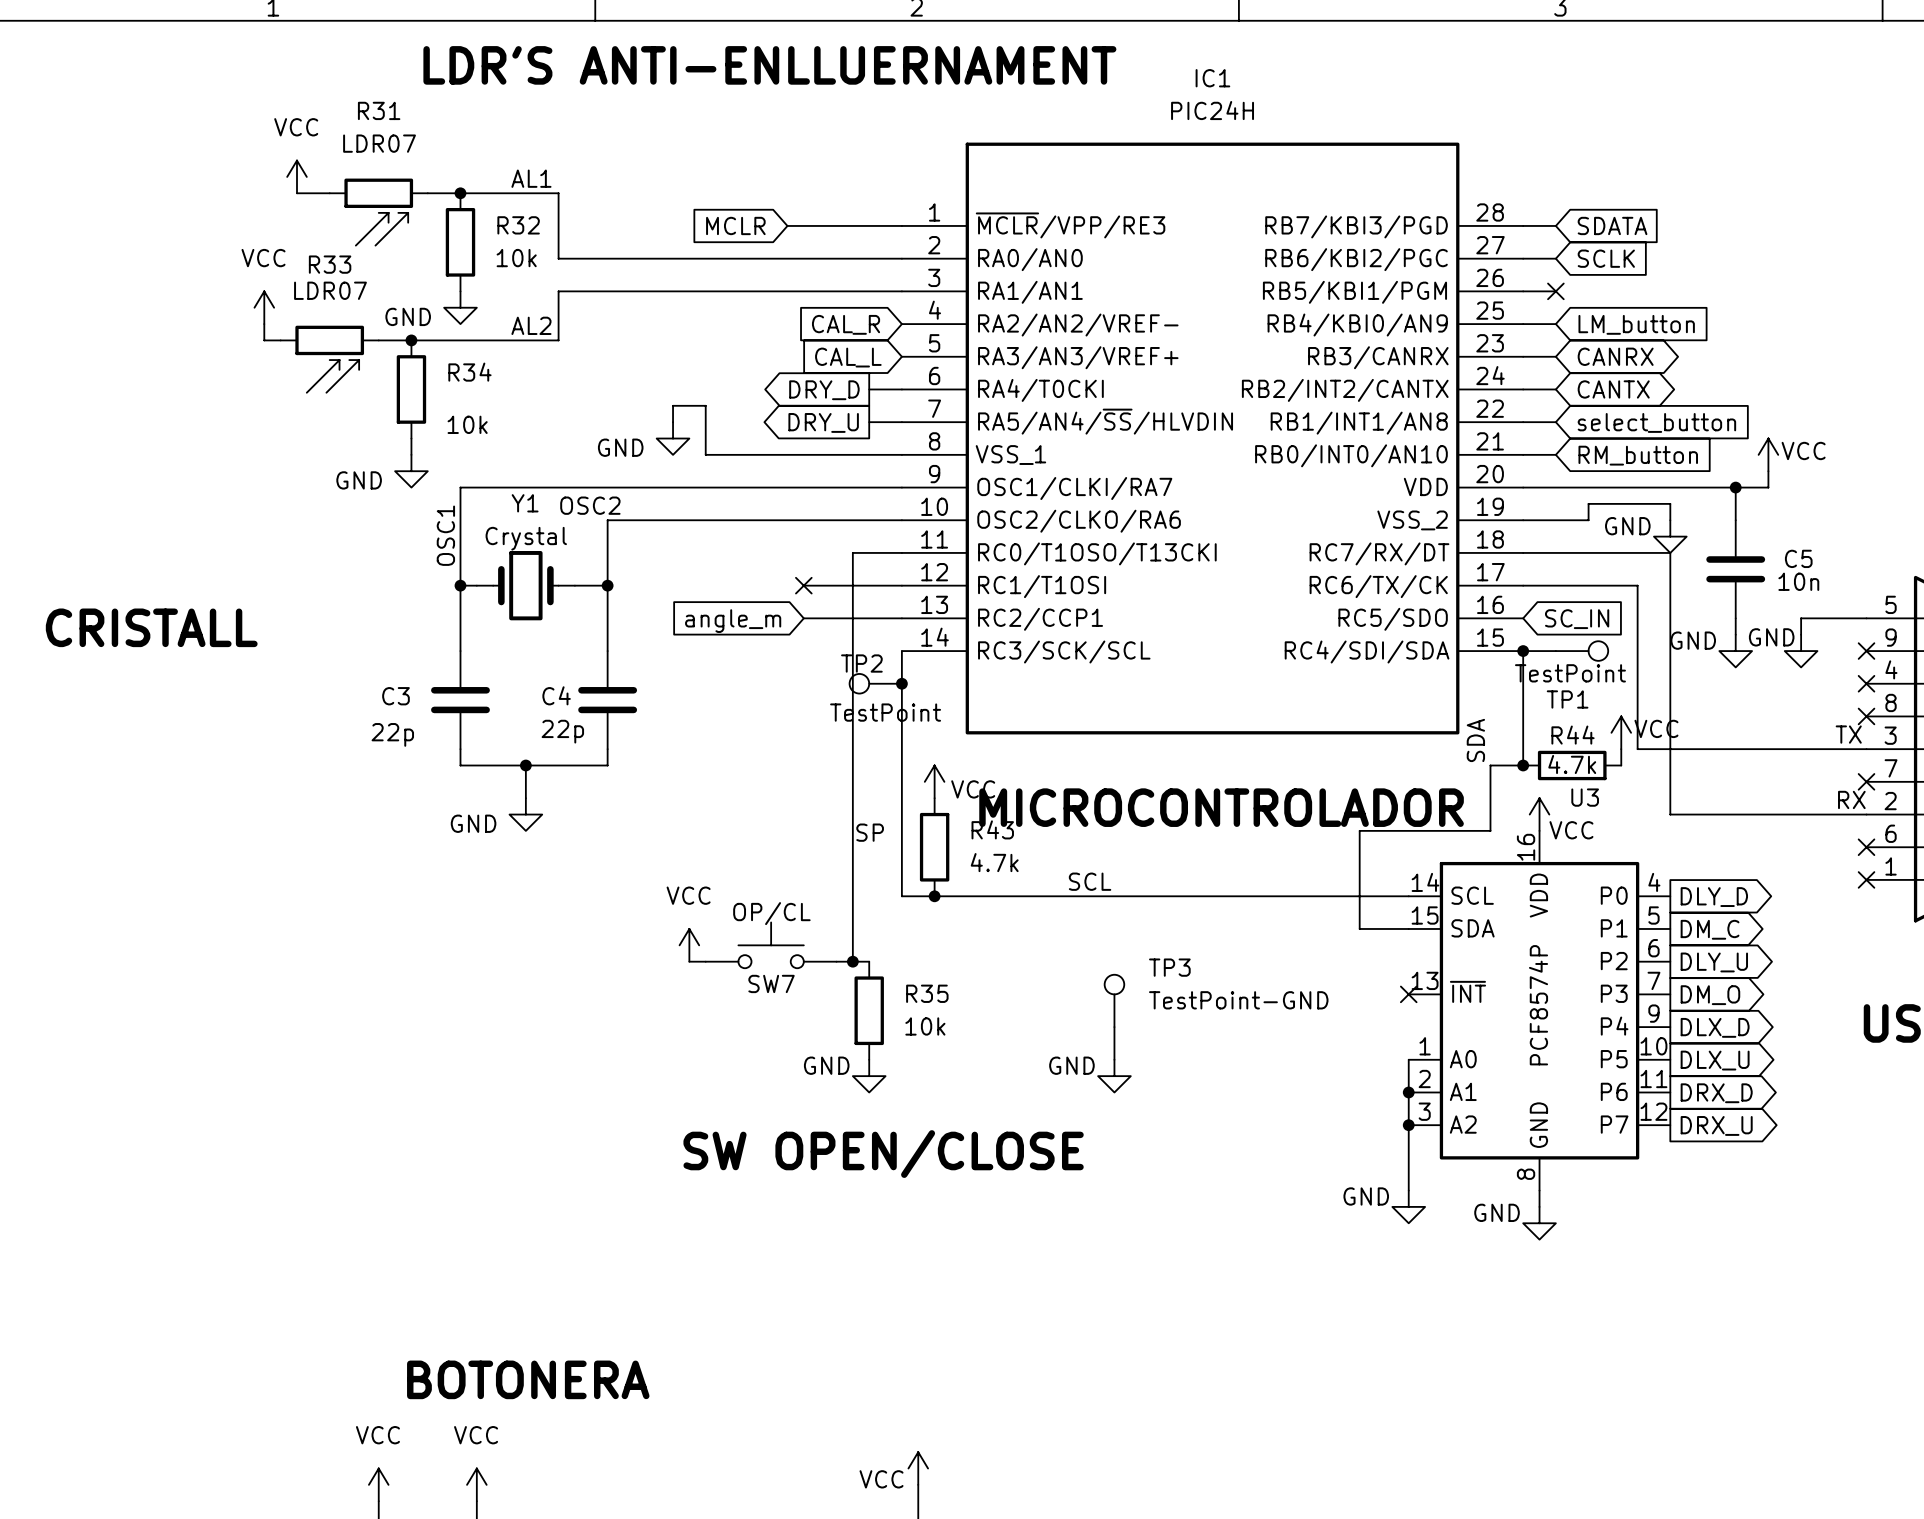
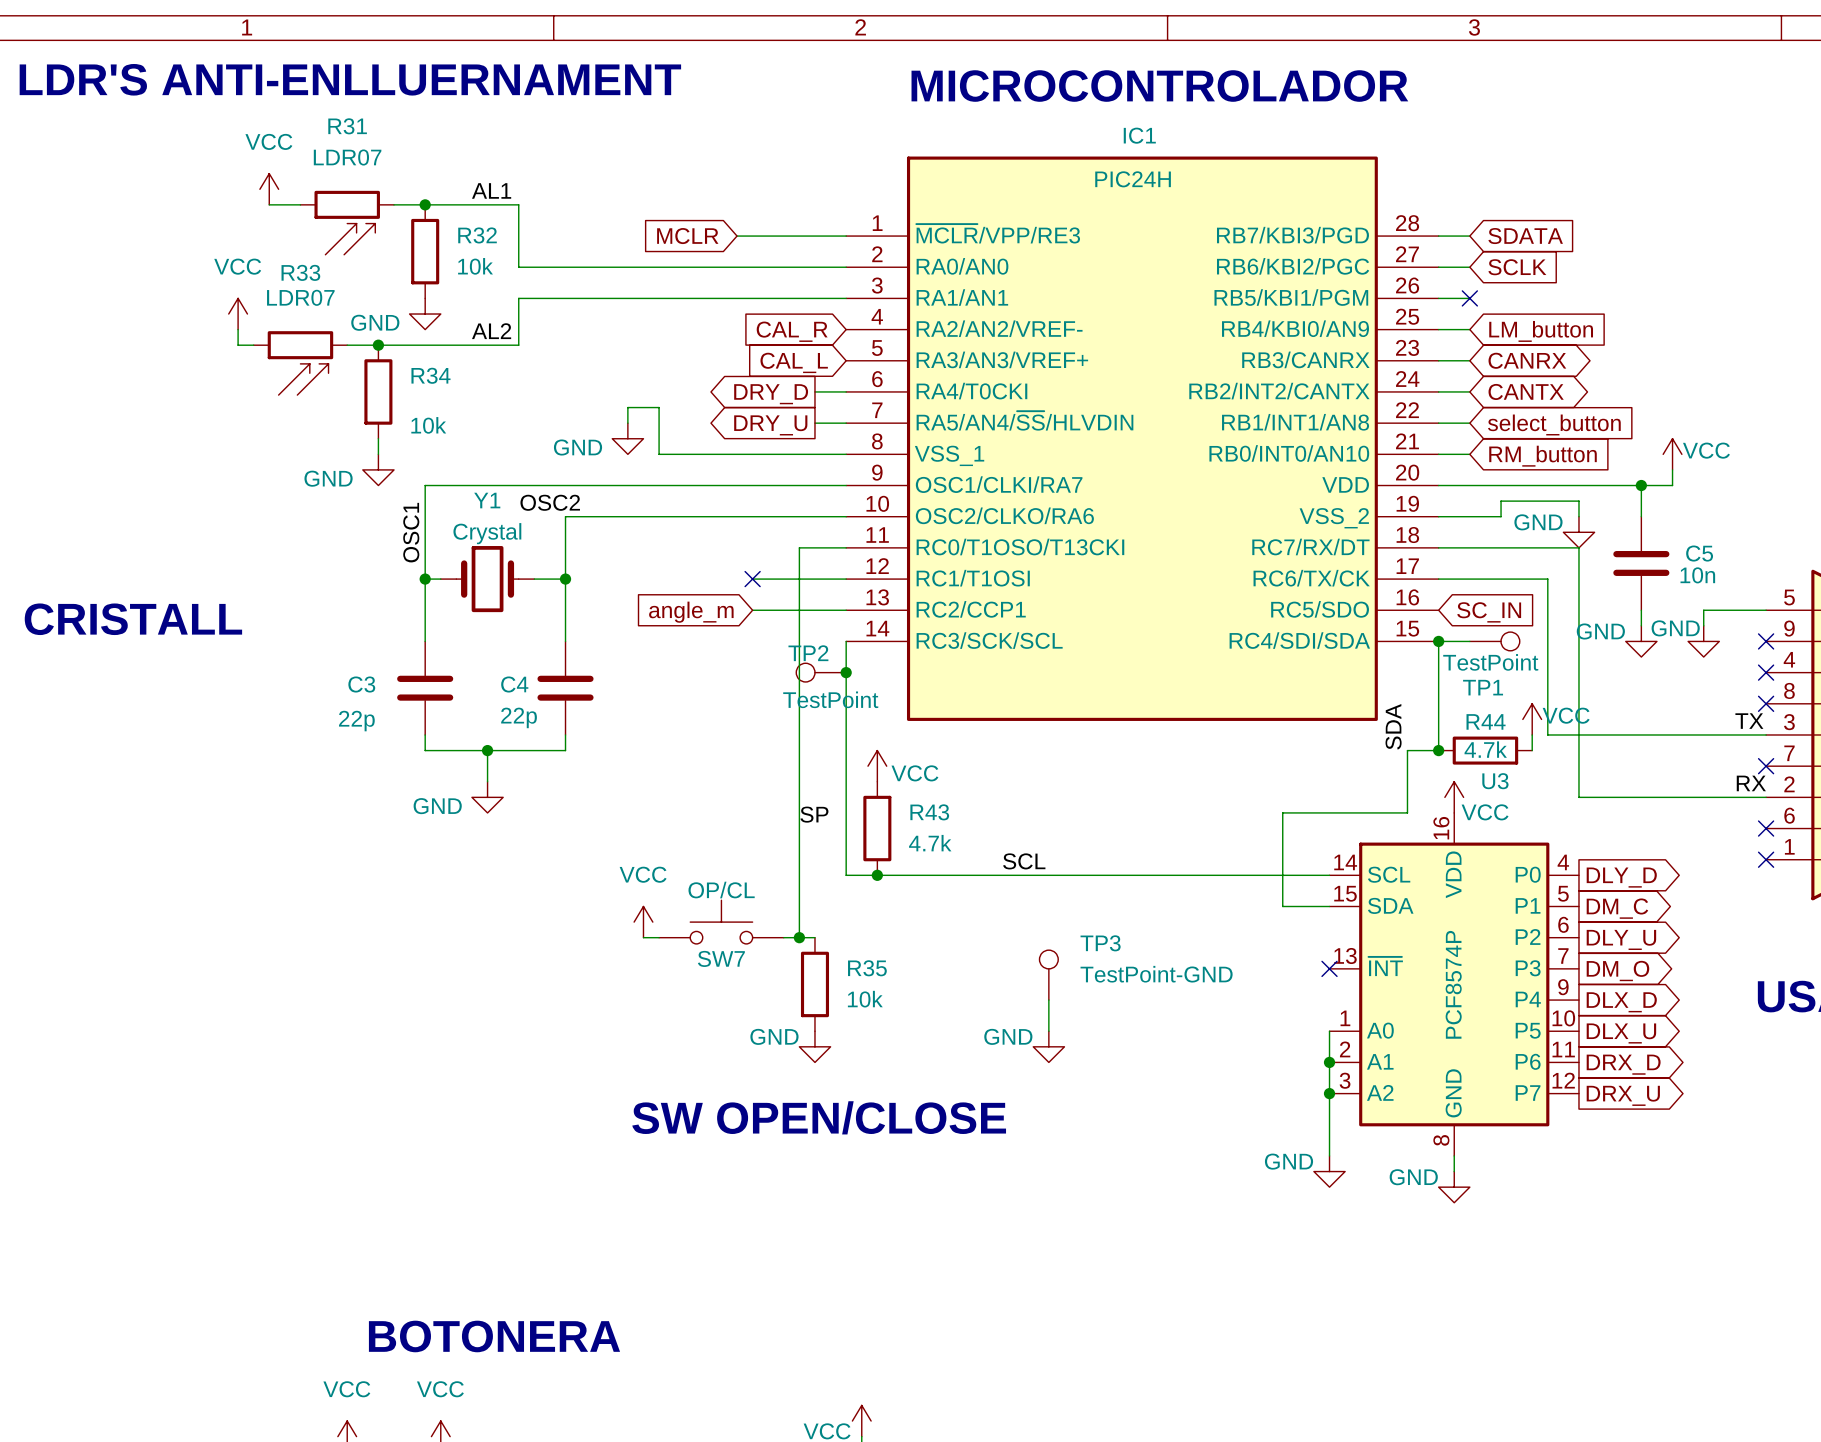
text: none -> LDR'S ANTI-ENLLUERNAMENT (350, 79)
text: LDR'S ANTI-ENLLUERNAMENT (769, 65) -> none
text: none -> MICROCONTROLADOR (1159, 86)
IC1 name position: IC1 (1212, 78) -> IC1 (1139, 135)
IC1 value position: PIC24H (1212, 110) -> PIC24H (1133, 179)
text: MICROCONTROLADOR (1221, 807) -> none

